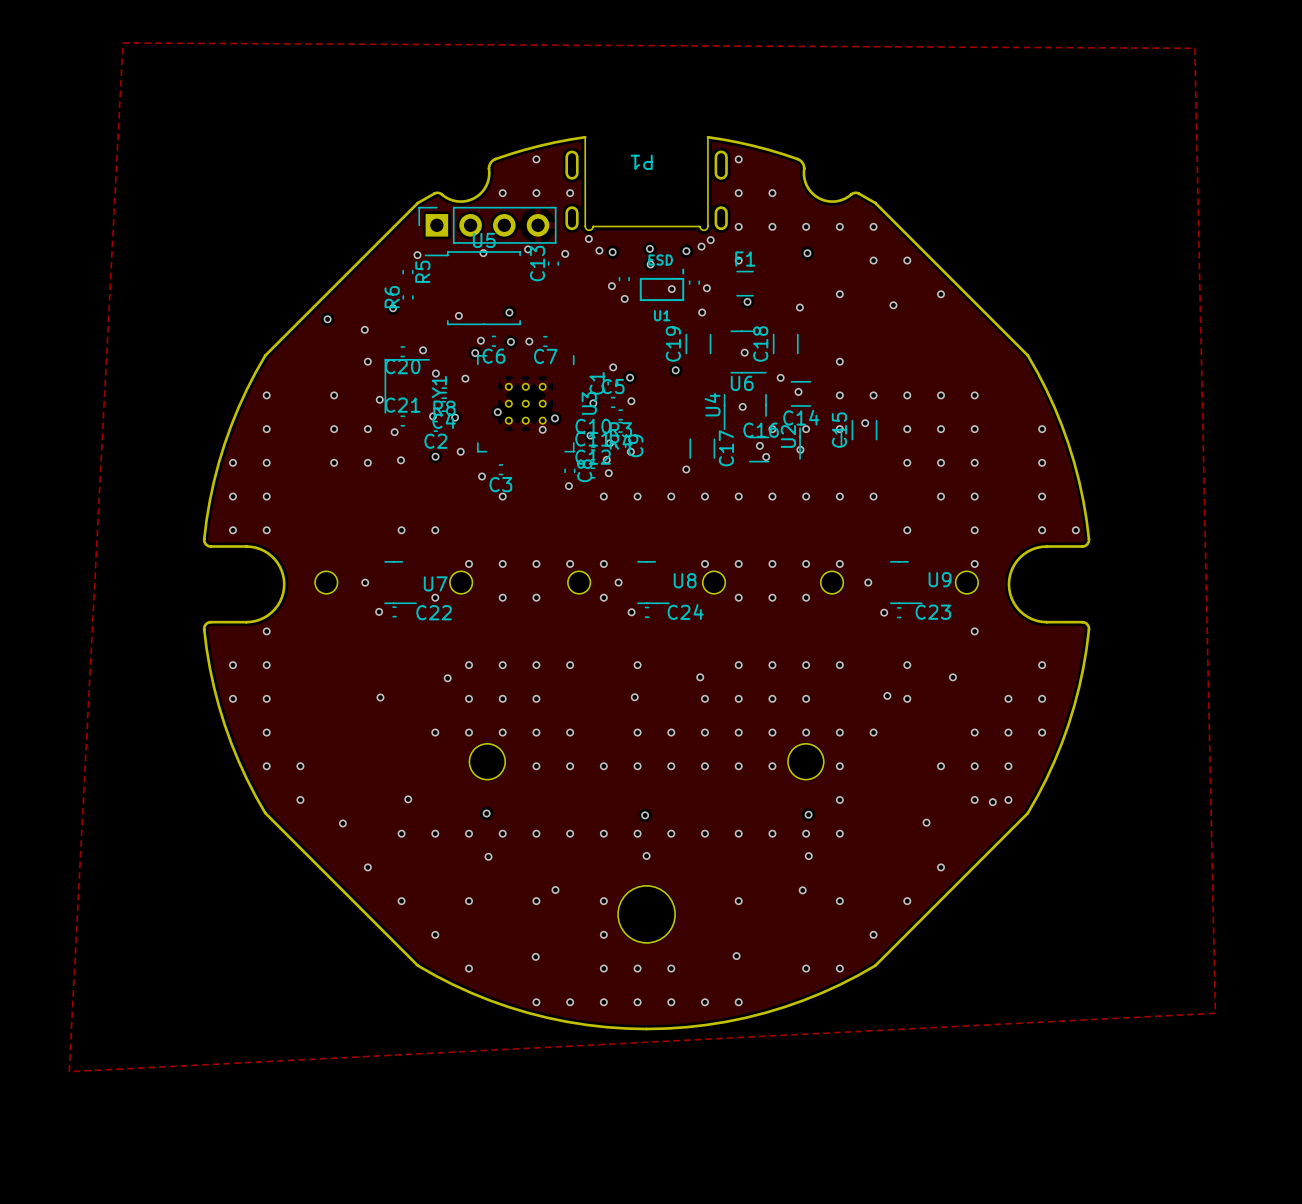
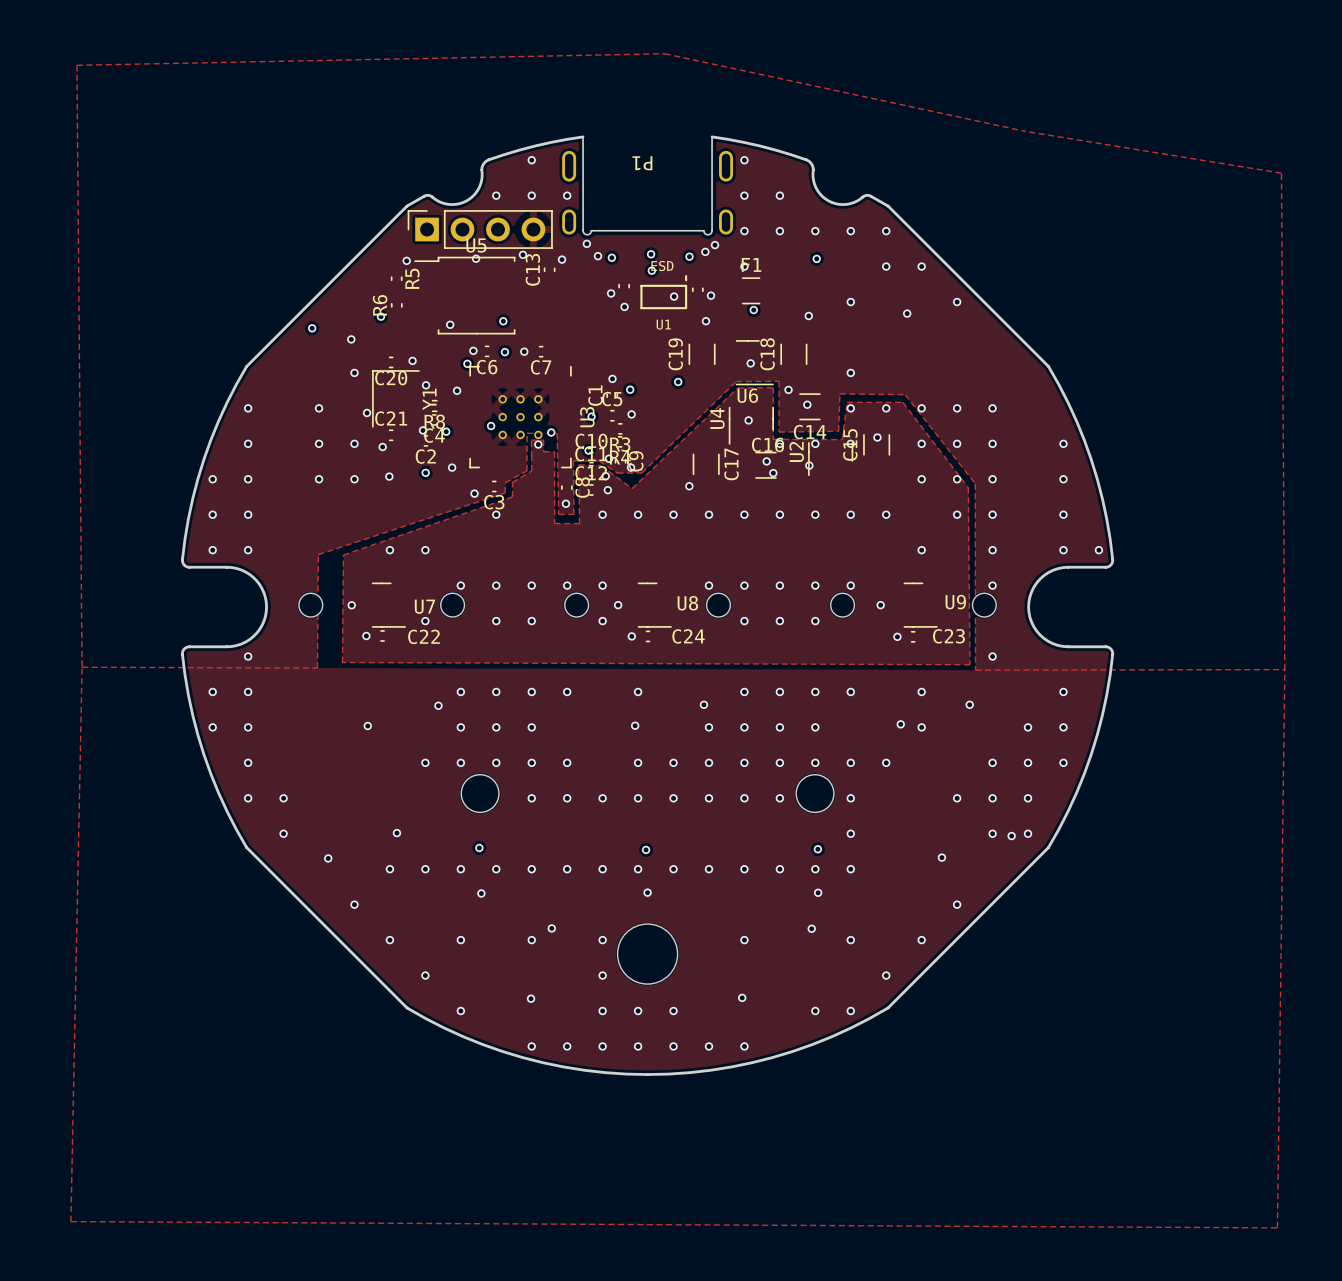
zone outline: (122, 43) (1194, 48) (1215, 1013) (69, 1071) (122, 43) -> none
zone outline: none -> (773, 387) (737, 387) (632, 488) (600, 465) (578, 464) (579, 523) (554, 523) (554, 451) (543, 451) (543, 440) (531, 440) (531, 470) (512, 482) (512, 496) (343, 555) (342, 662) (969, 664) (968, 487) (902, 402) (847, 402) (842, 439) (773, 439) (773, 387)
zone outline: none -> (82, 667) (70, 1221) (1277, 1227) (1284, 669)
zone outline: none -> (82, 667) (317, 668) (318, 554) (505, 492) (505, 482) (527, 470) (527, 433) (557, 433) (558, 514) (573, 514) (573, 460) (599, 460) (617, 473) (641, 472) (736, 381) (779, 381) (779, 432) (838, 431) (839, 393) (905, 394) (975, 483) (975, 670) (1284, 669)
zone outline: none -> (82, 667) (76, 65) (664, 53) (1024, 131) (1281, 173) (1284, 669)

